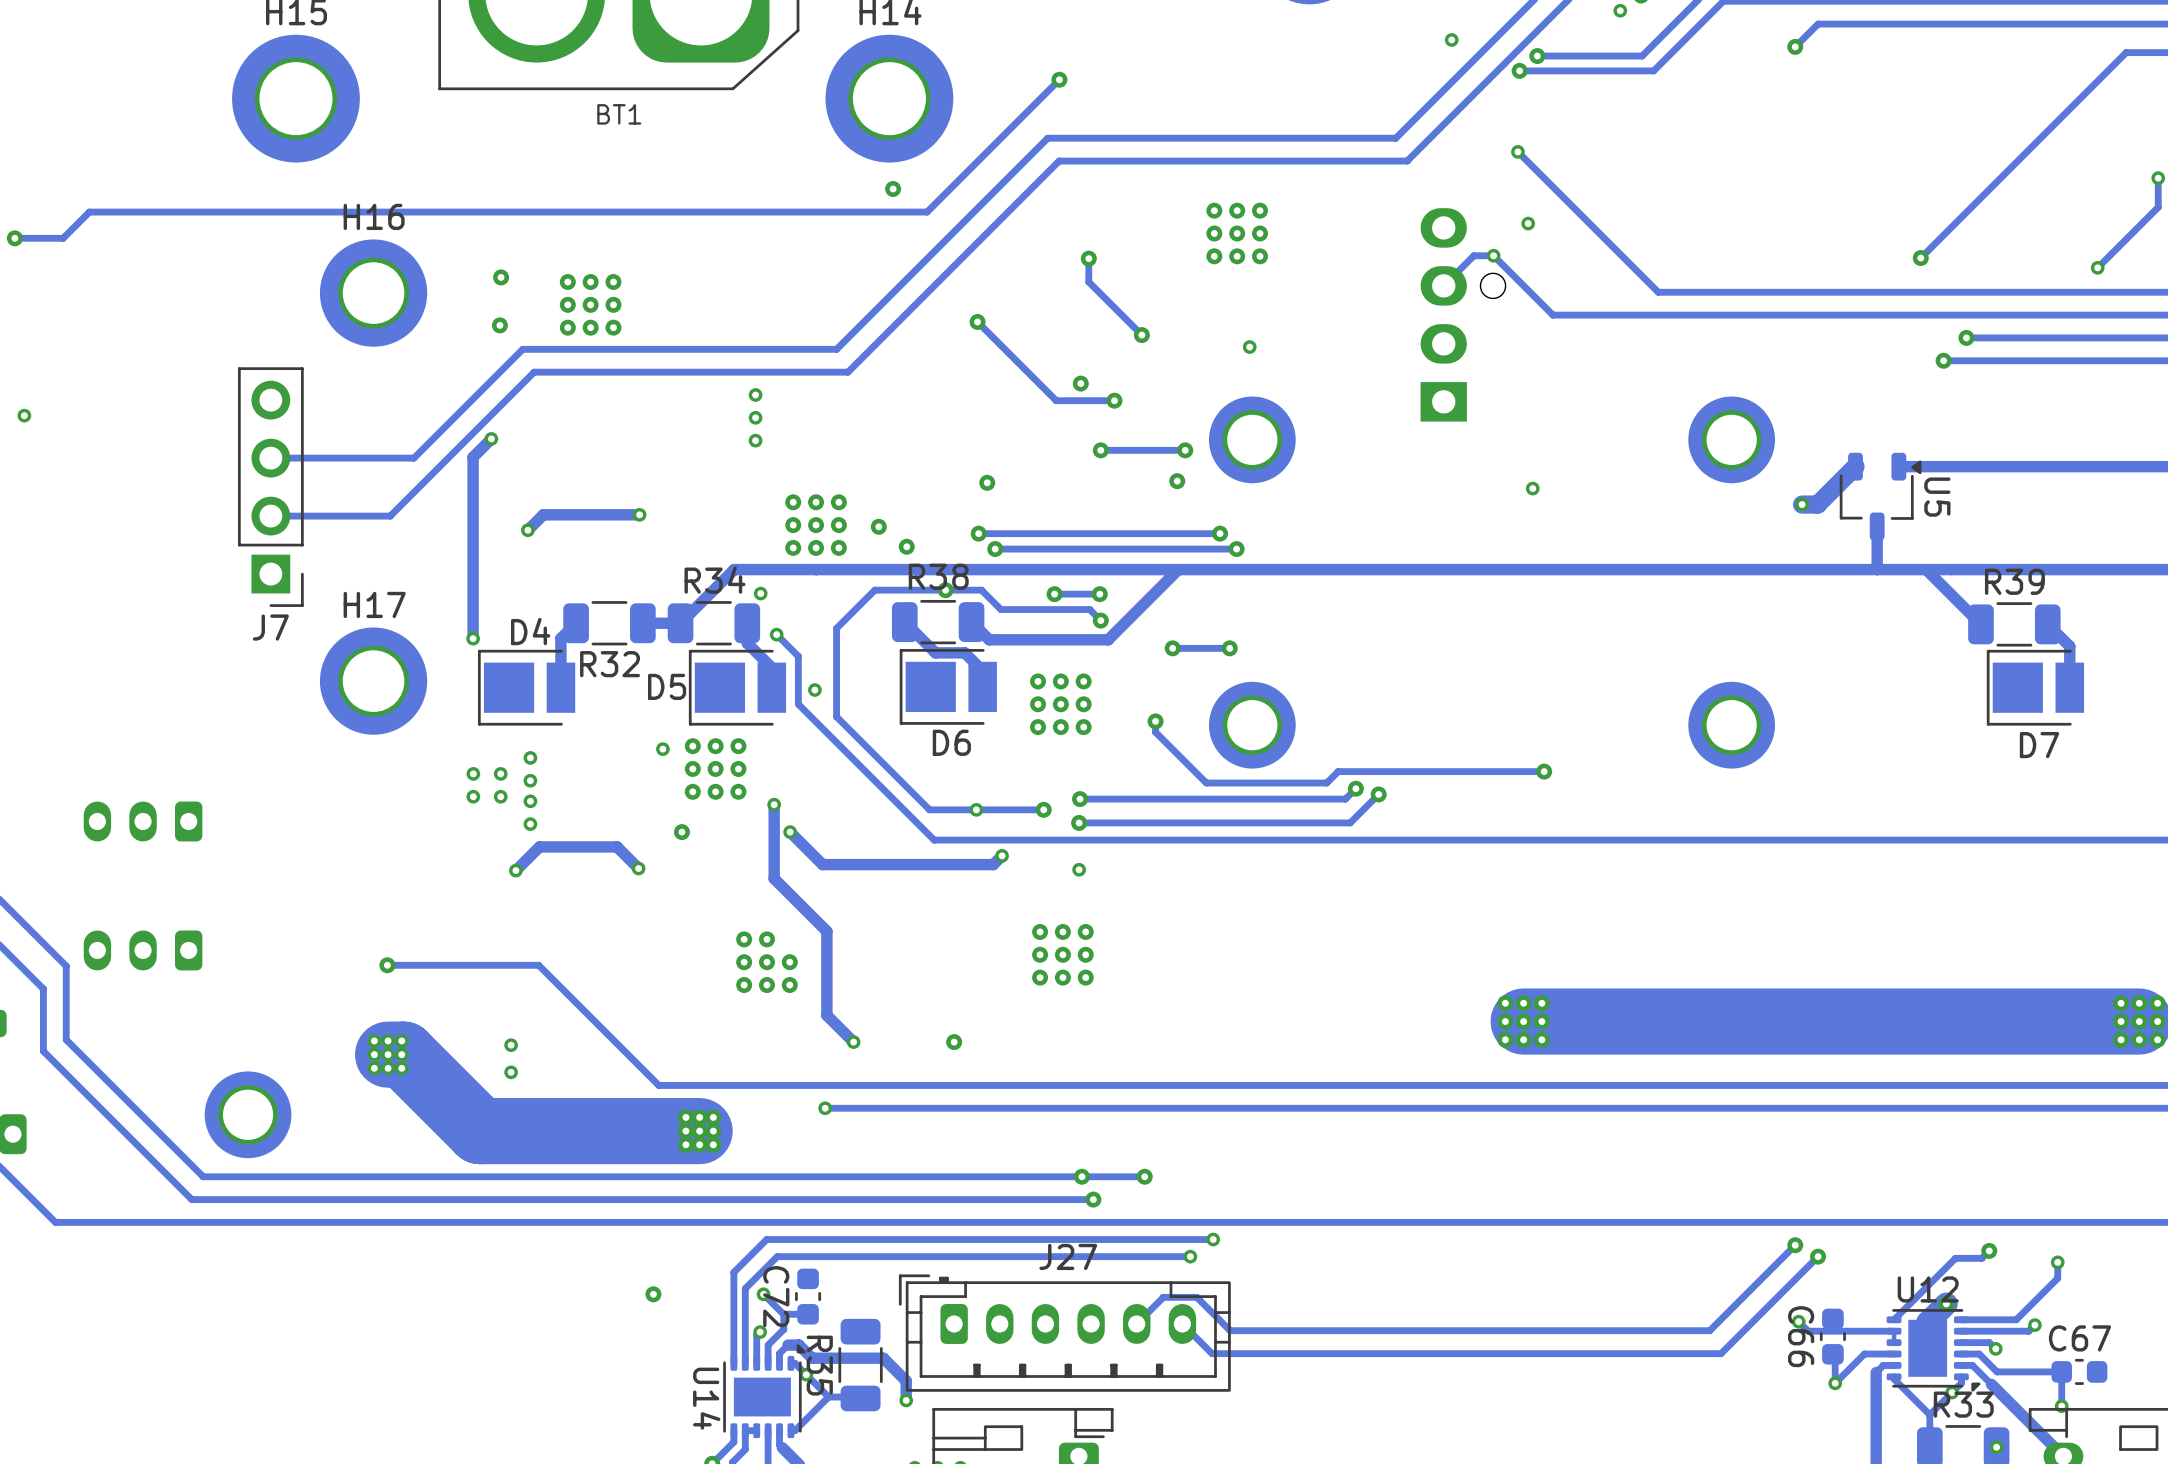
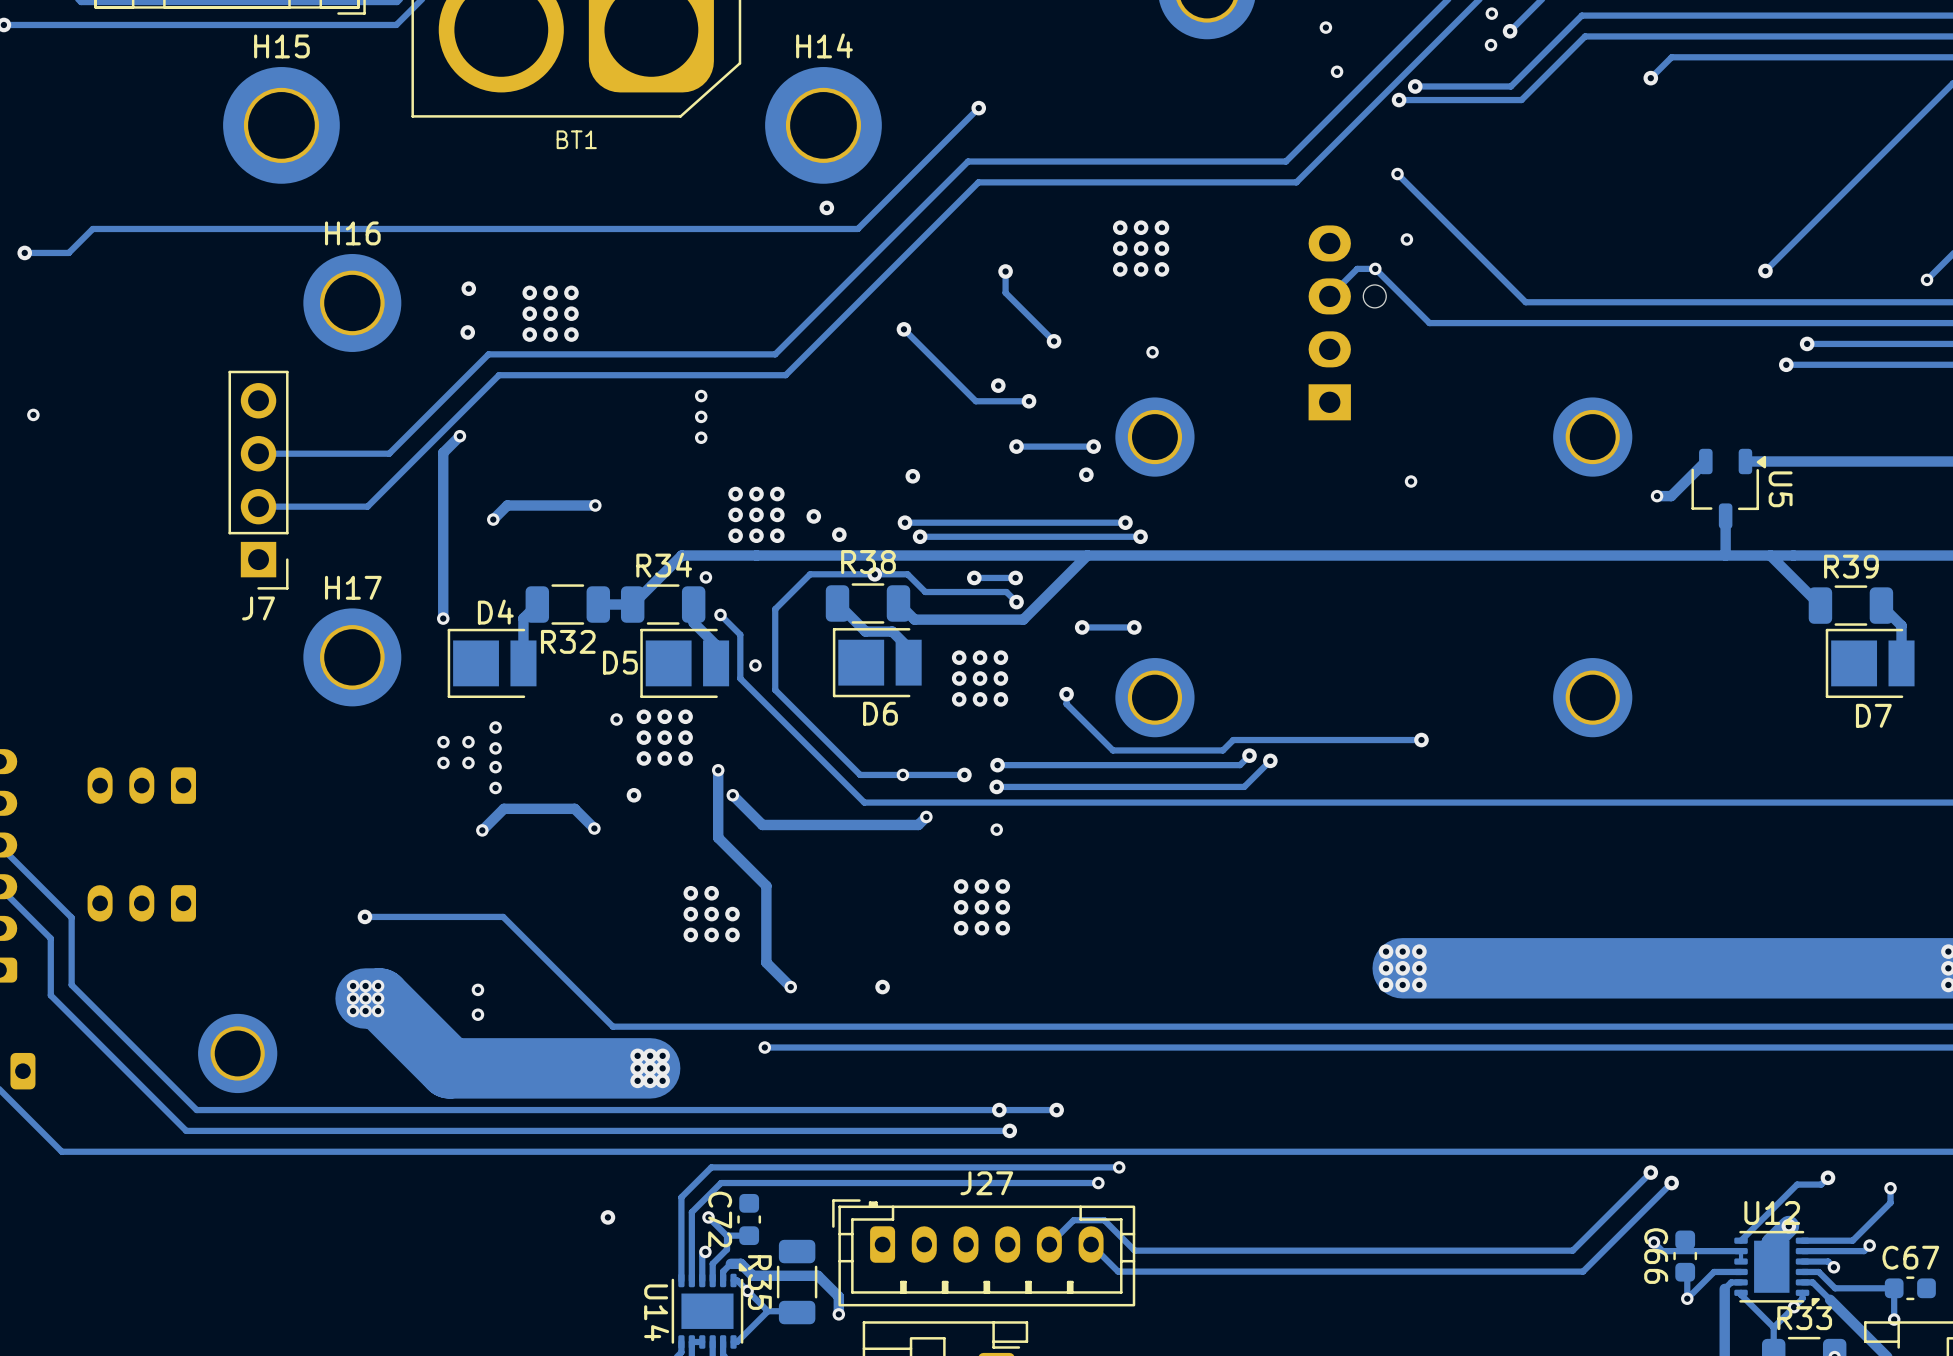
track width: thick (1855, 466) (1817, 504) (1802, 504) -> thin (1705, 461) (1671, 496) (1657, 496)

